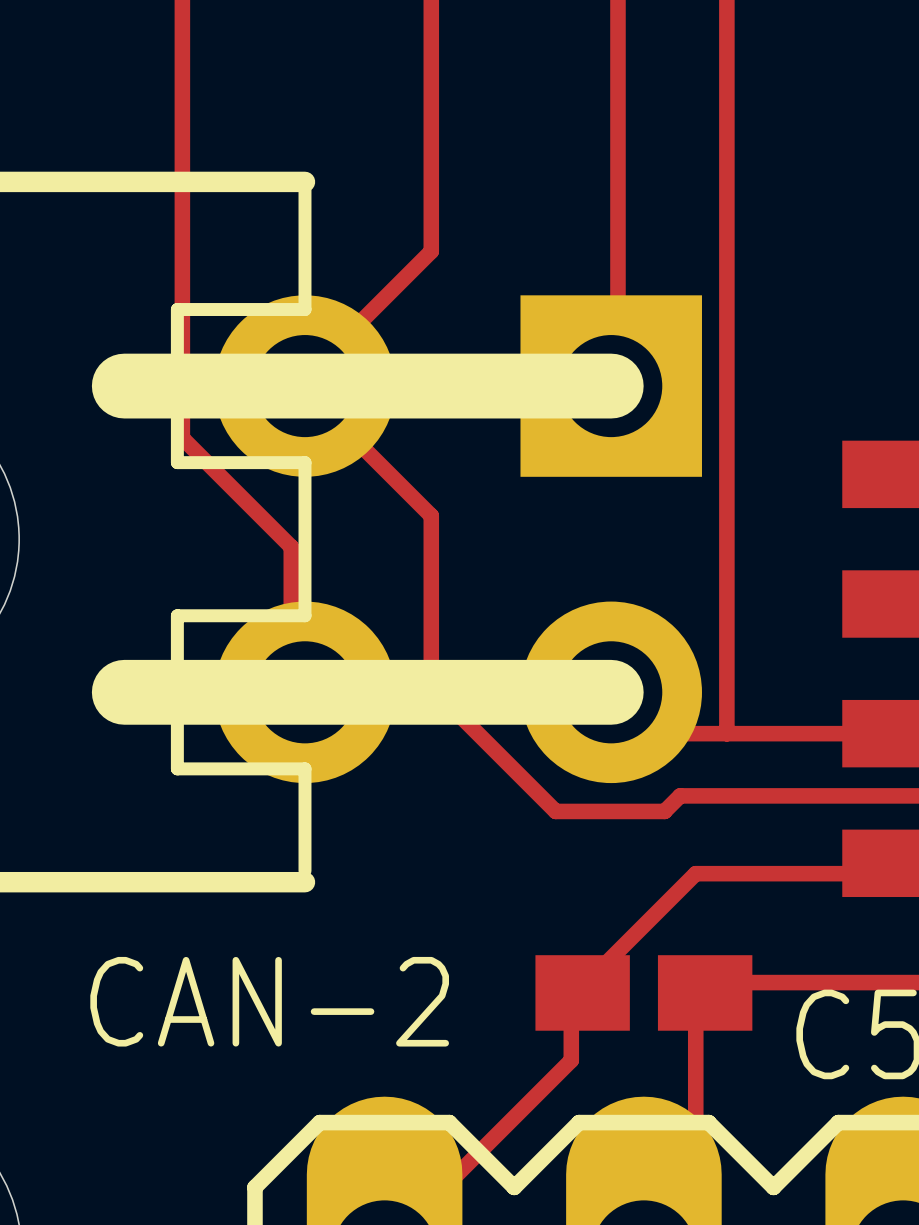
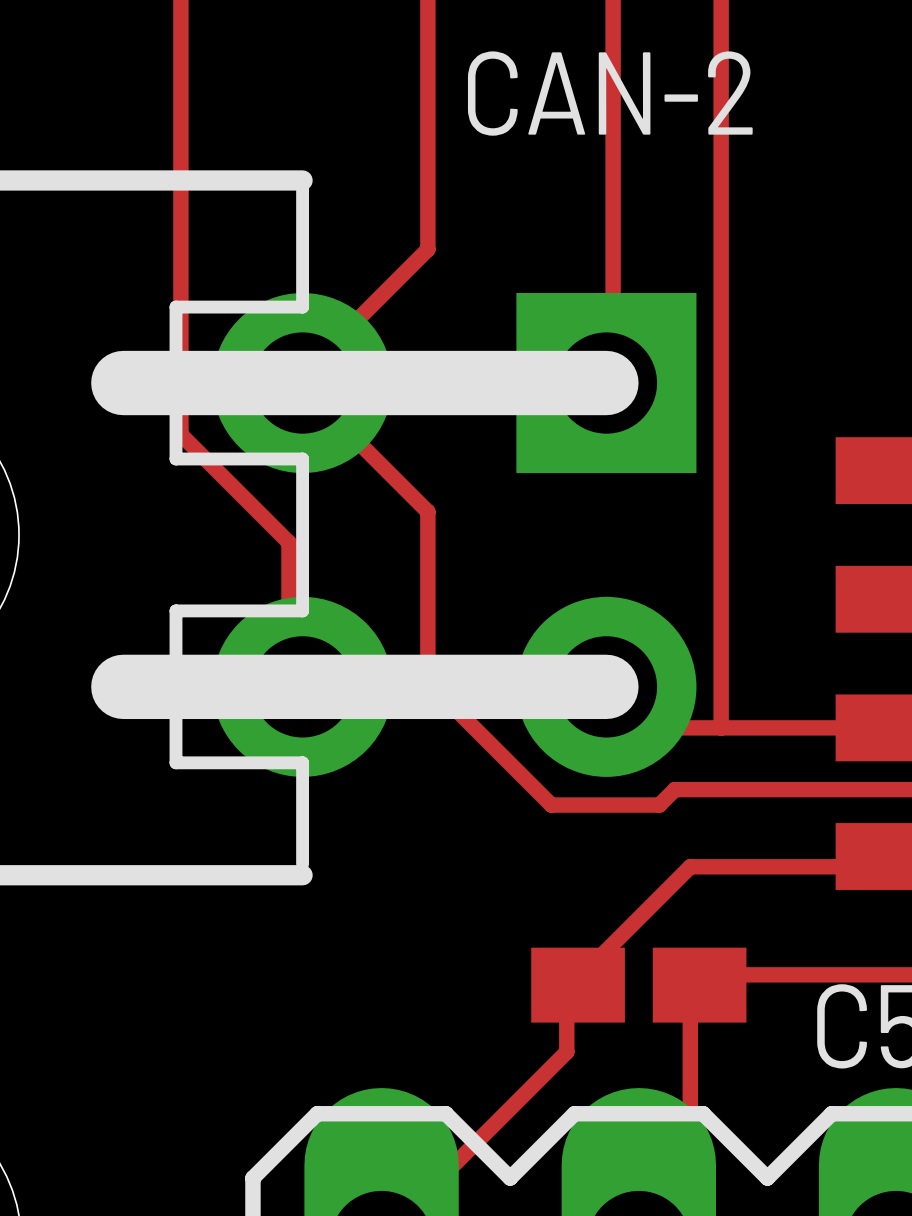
CAN-2 name position: CAN-2 (269, 1001) -> CAN-2 (610, 93)

